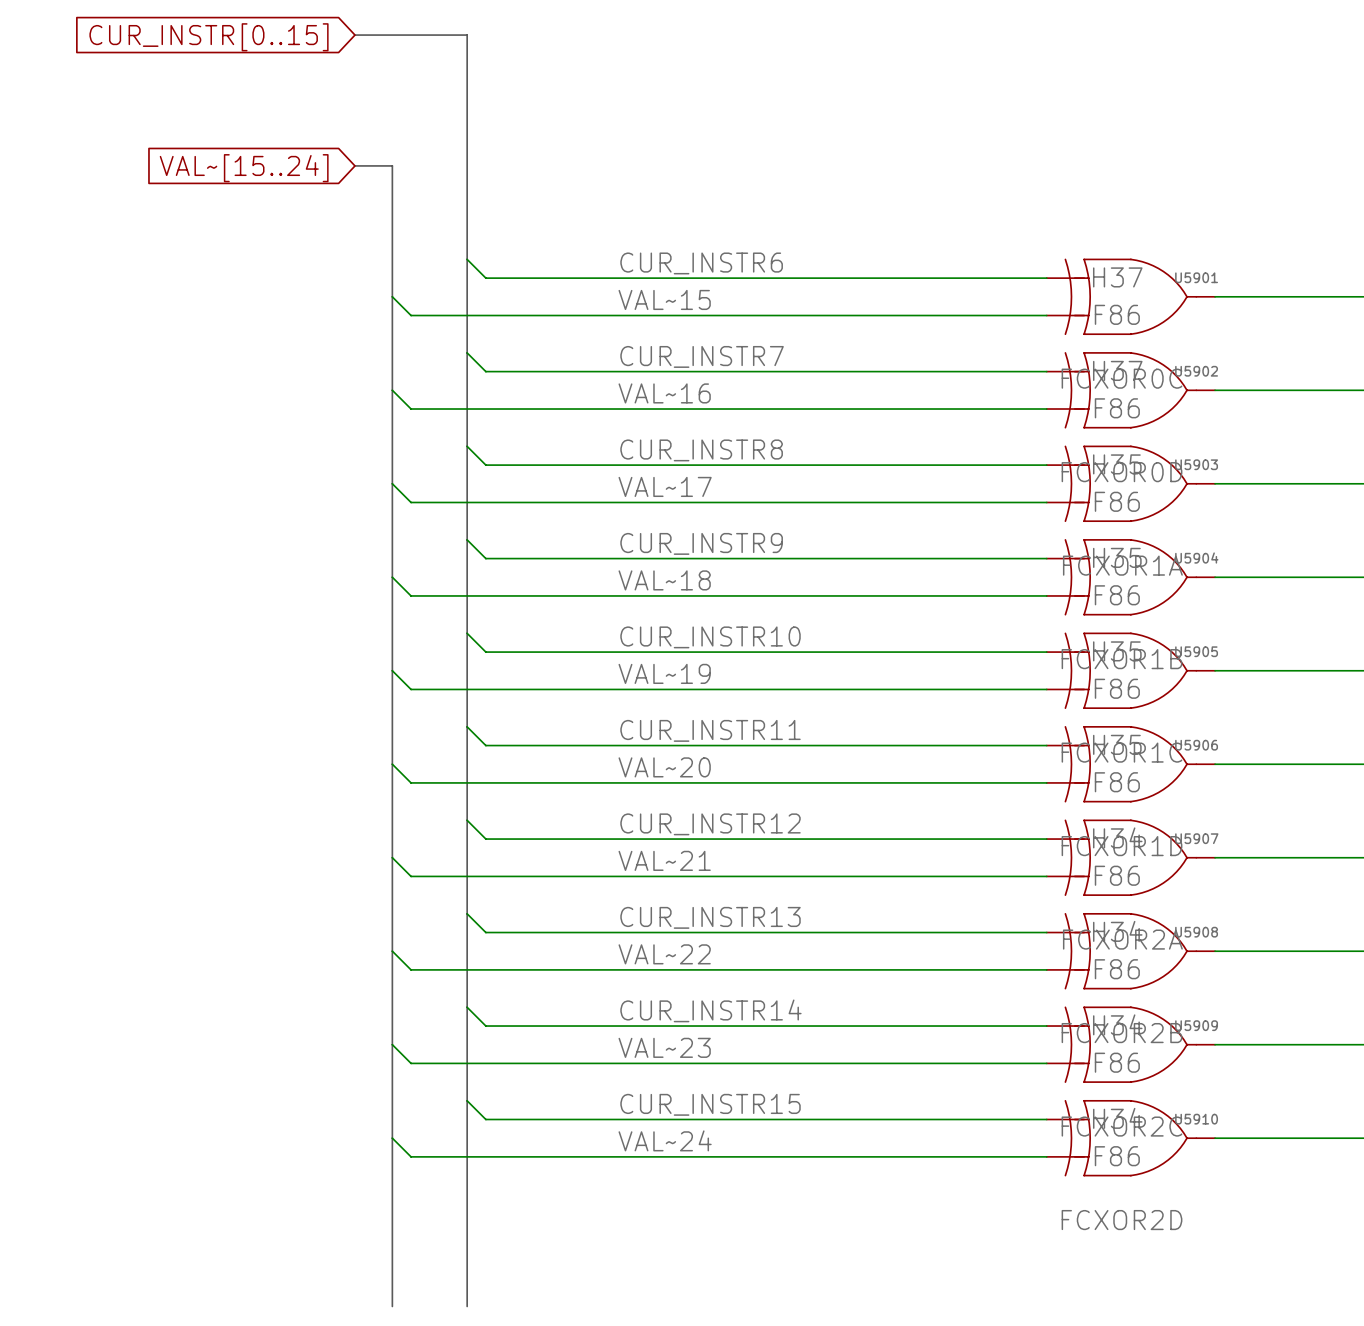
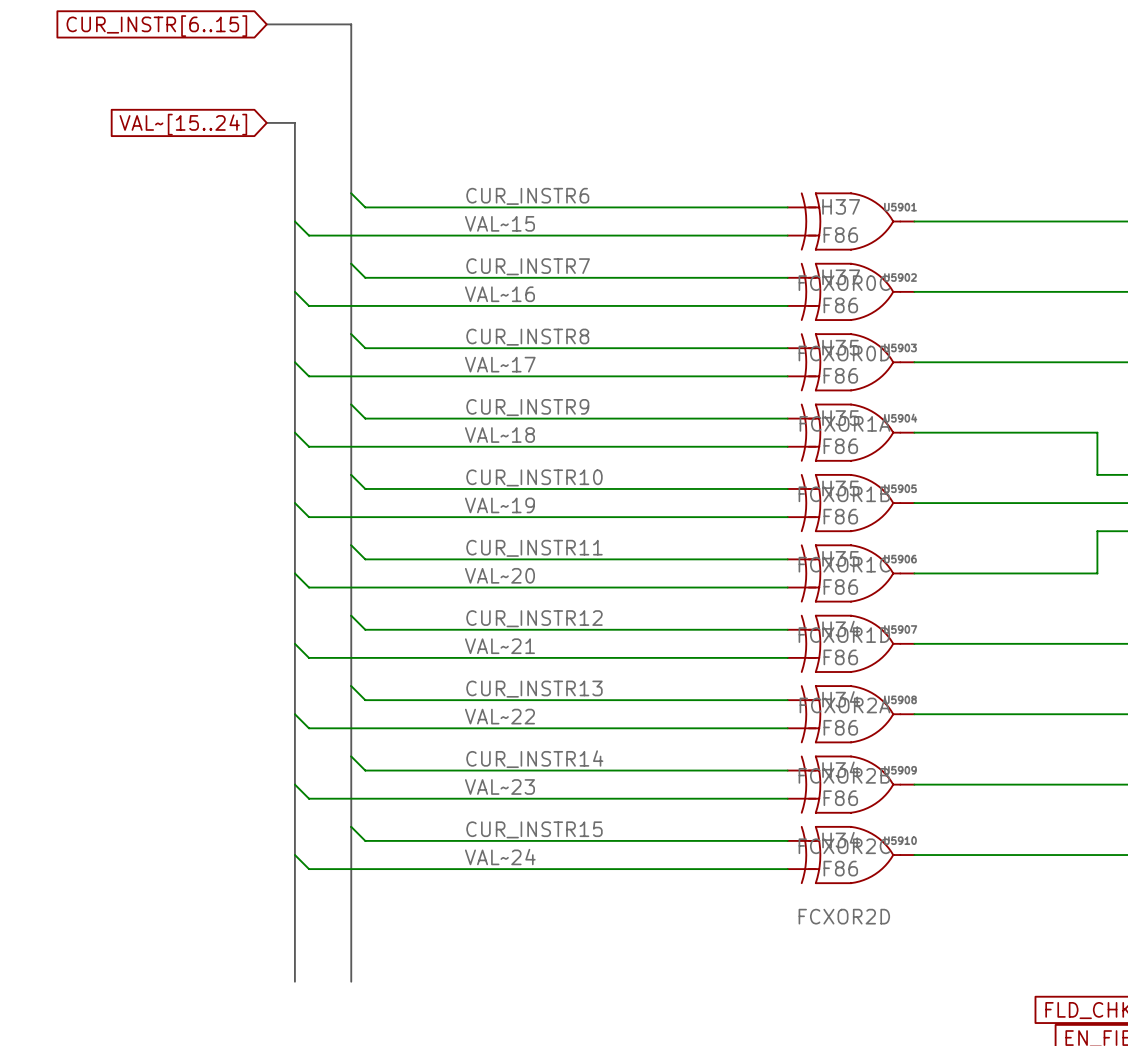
global label: CUR_INSTR[0..15] (208, 37) -> CUR_INSTR[6..15] (156, 26)

